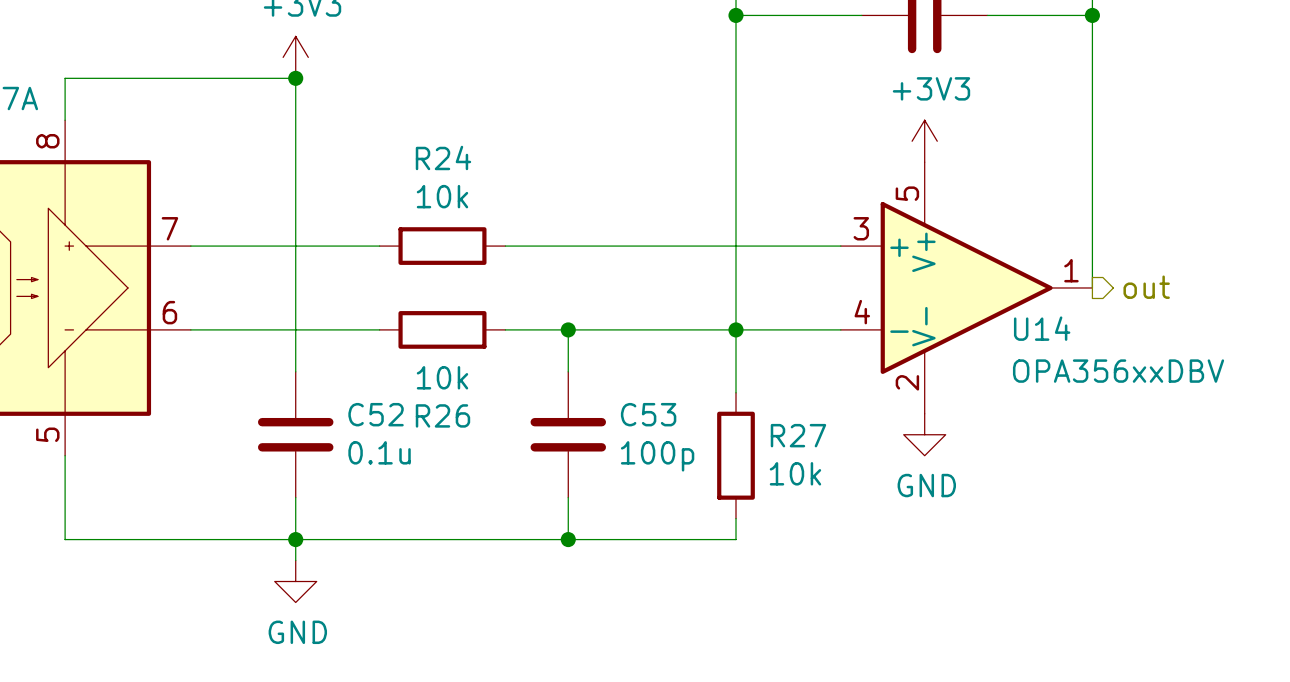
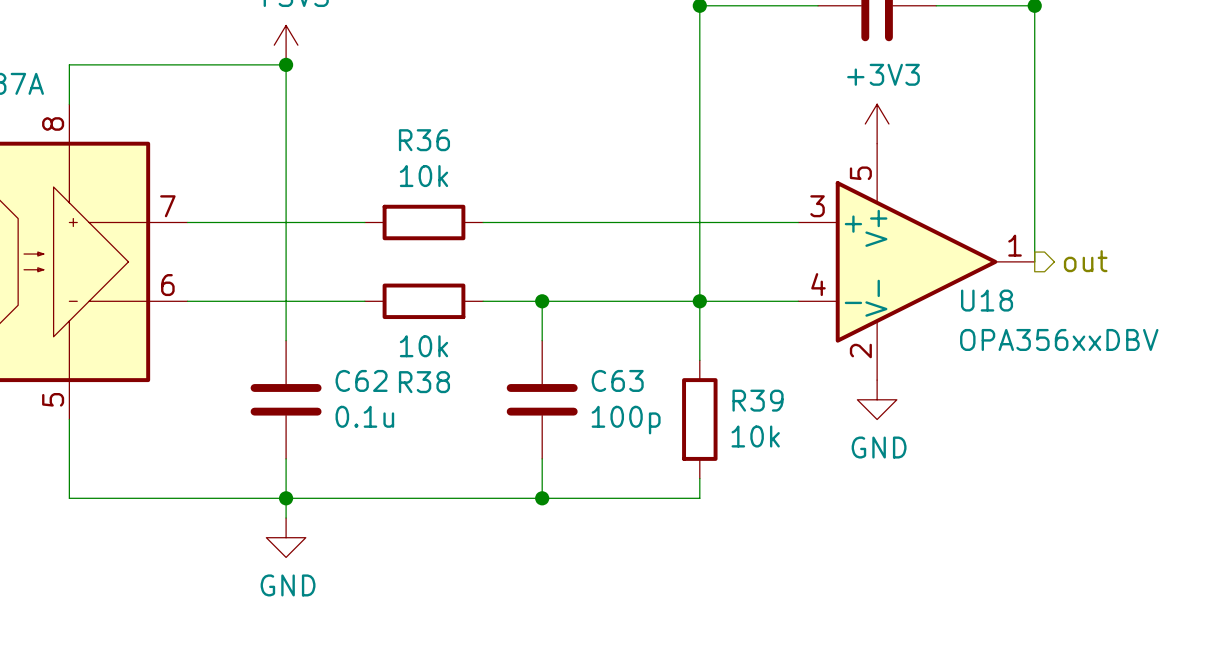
R24 name: R24 (443, 157) -> R36 (424, 140)
U14 name: U14 (1042, 328) -> U18 (987, 300)
C52 name: C52 (376, 414) -> C62 (361, 380)
C53 name: C53 (648, 414) -> C63 (617, 380)
R26 name: R26 (442, 415) -> R38 (424, 382)
R27 name: R27 (798, 435) -> R39 (758, 400)

